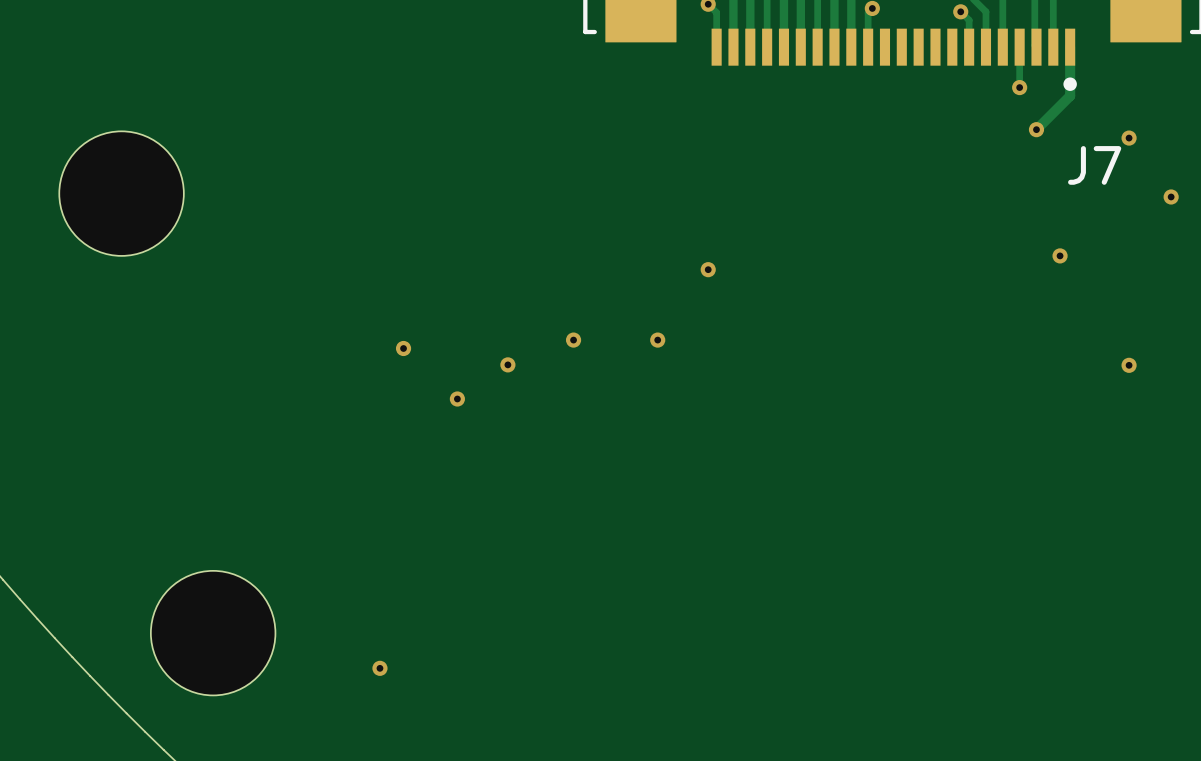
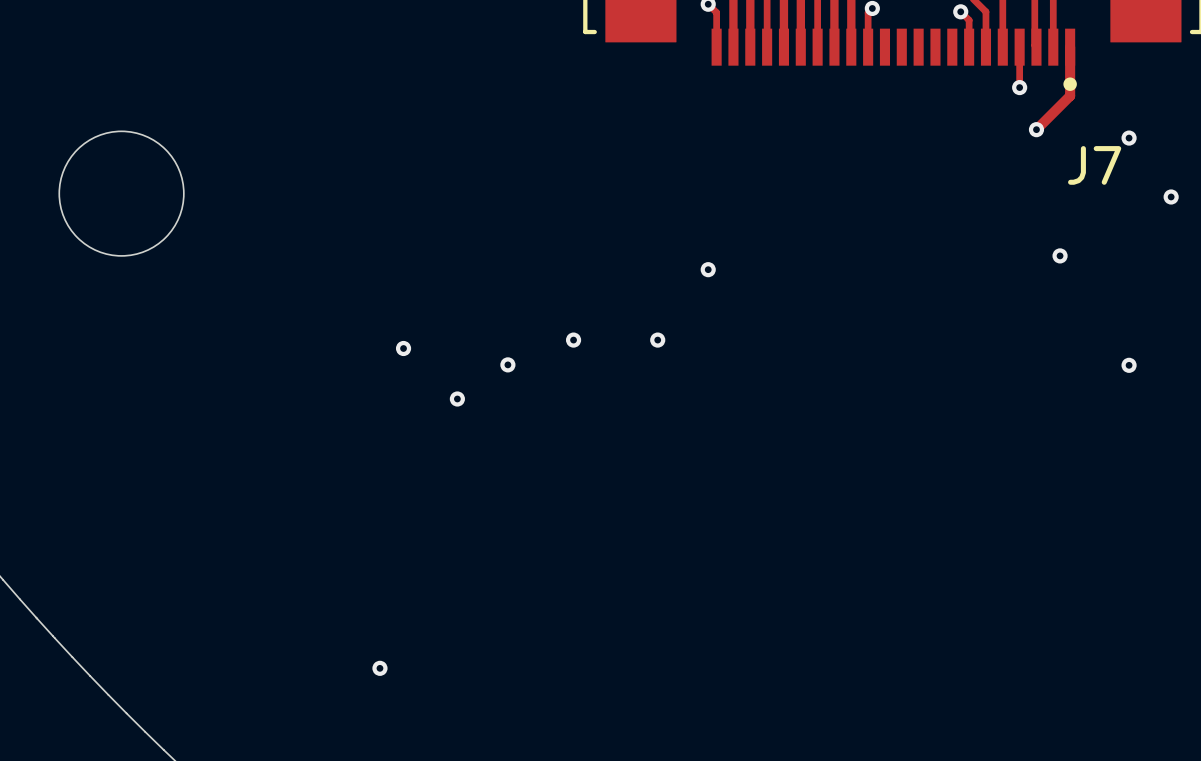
part: (213, 633) -> none

